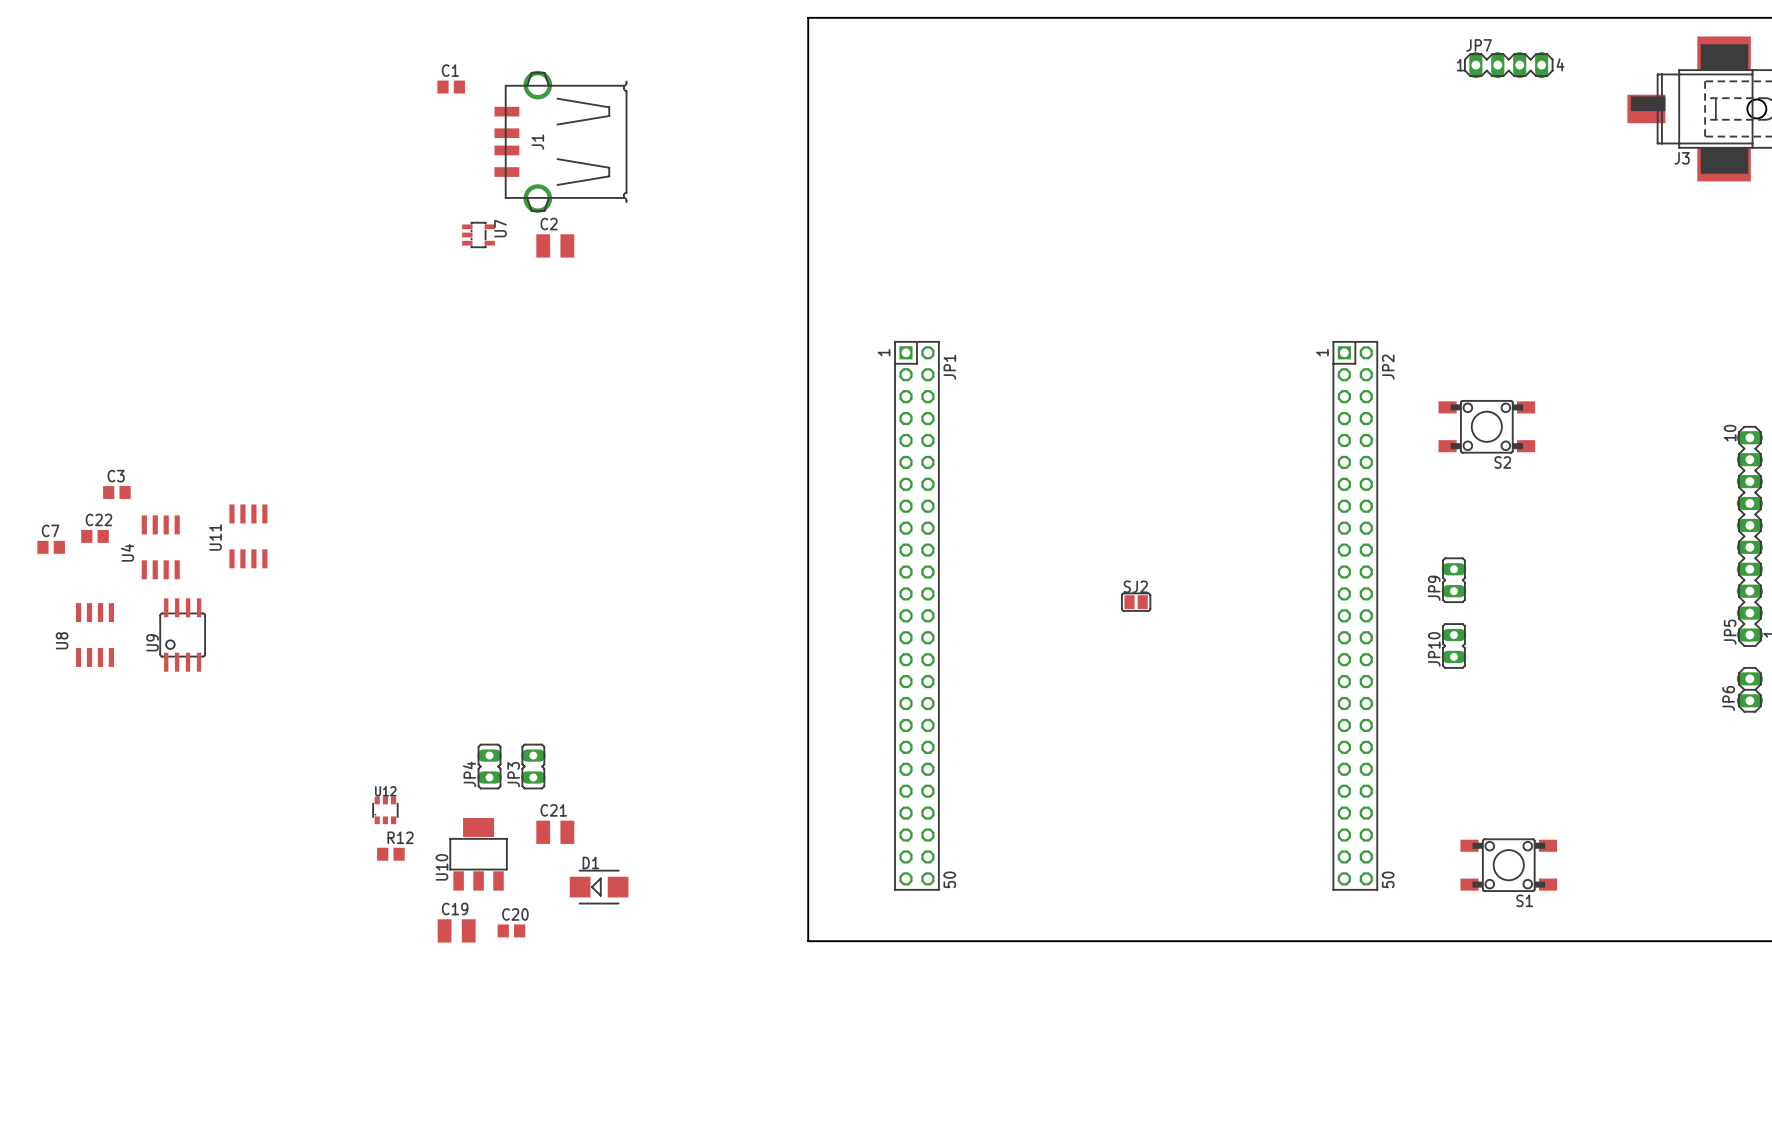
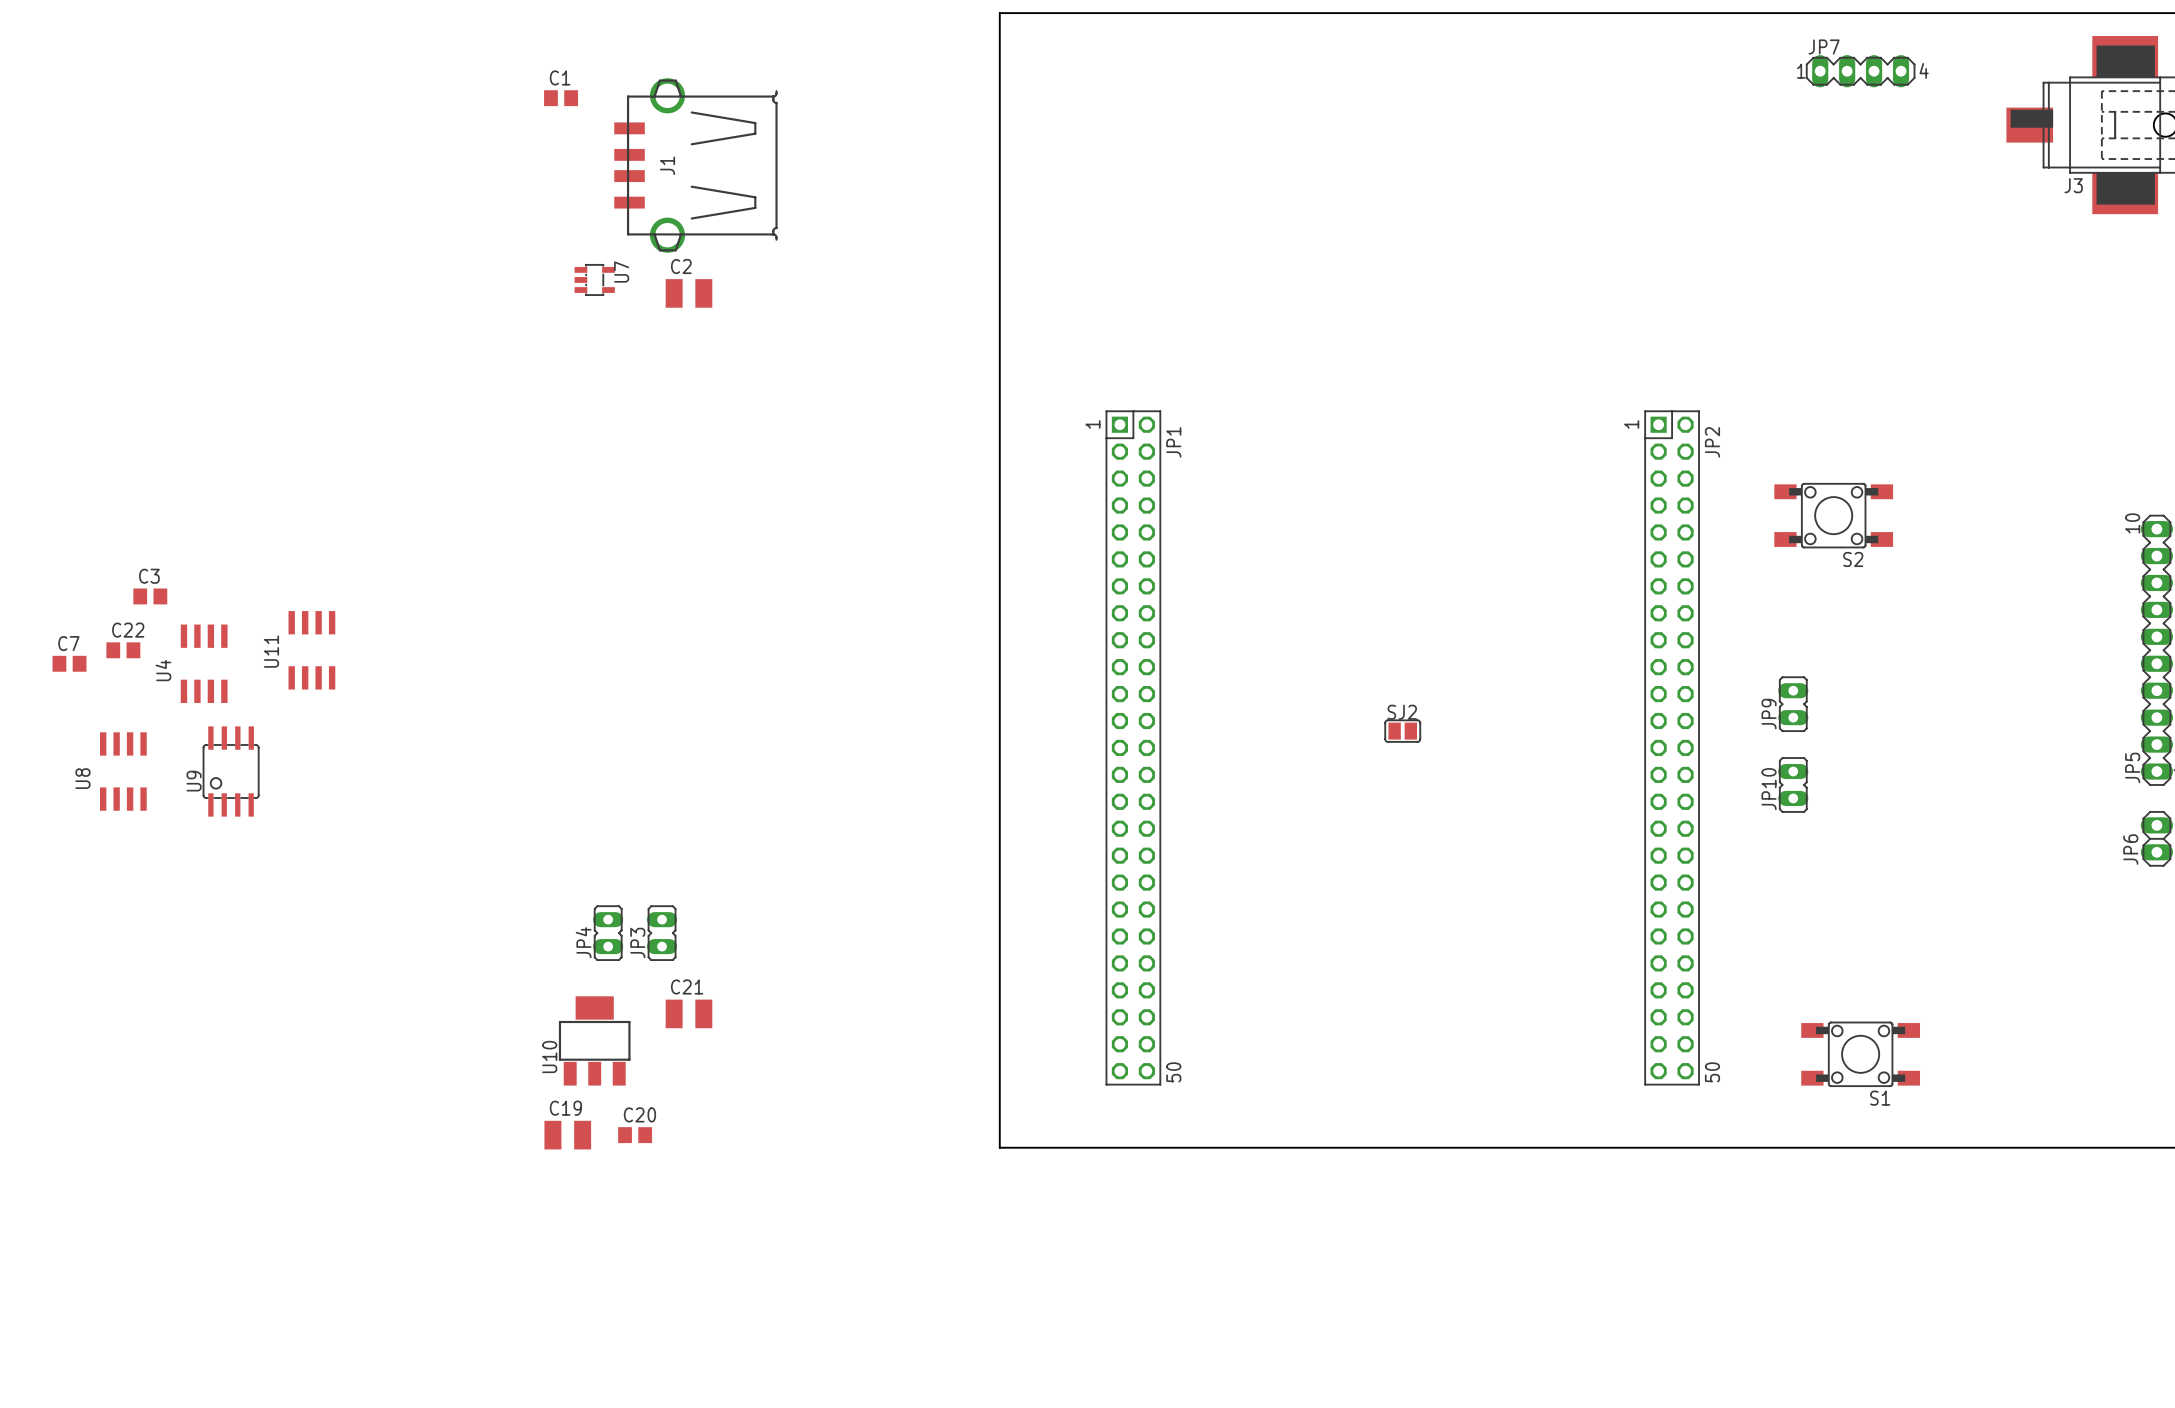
U12: (385, 810) -> none
R12: (390, 854) -> none
D1: (599, 887) -> none

